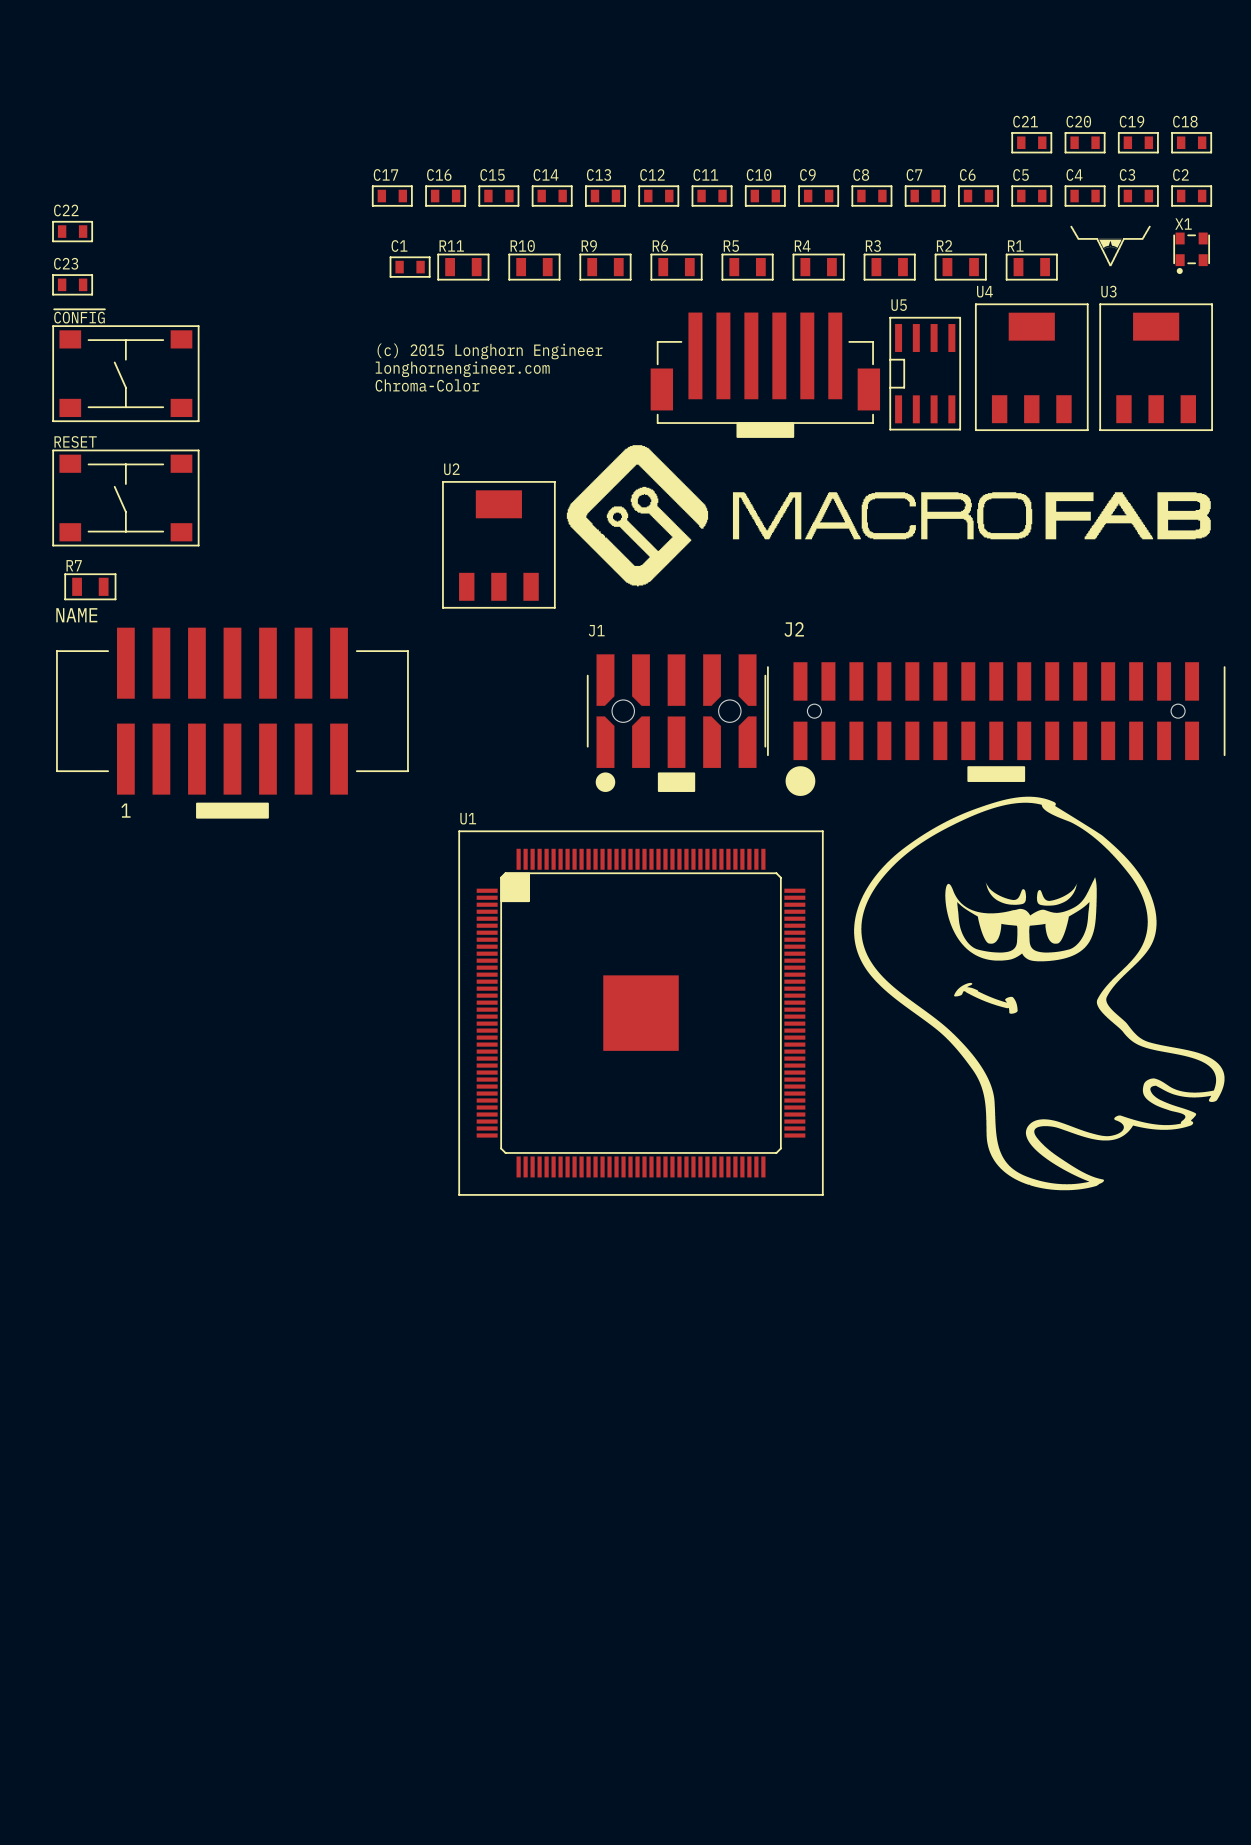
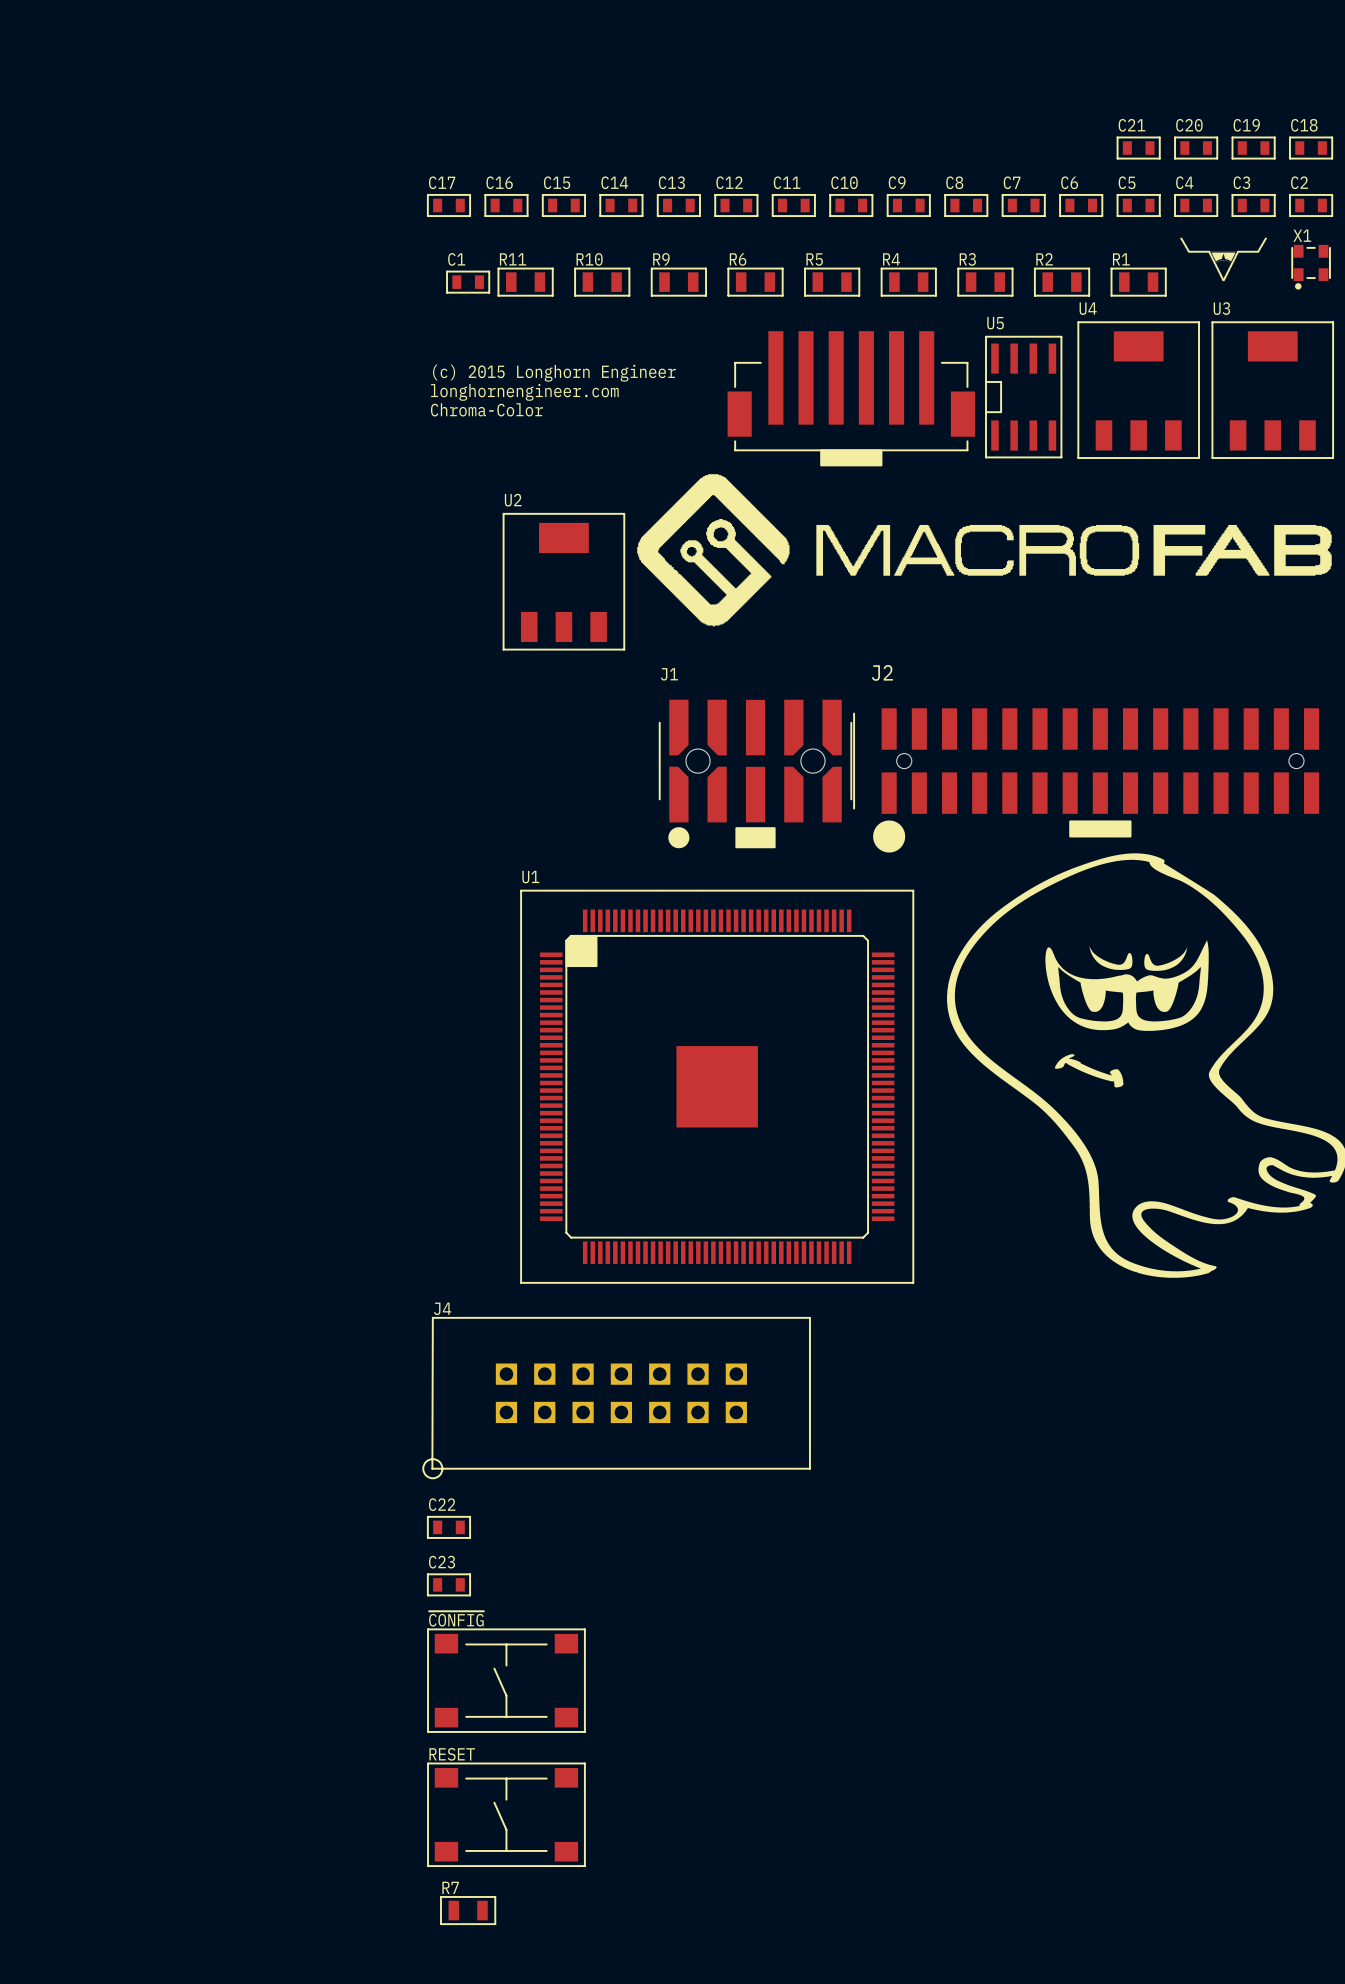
C22 position: (72, 231) -> (448, 1527)
C23 position: (72, 284) -> (448, 1584)
~{CONFIG}: (125, 373) -> none
RESET: (125, 498) -> none
R7 position: (90, 586) -> (468, 1910)
part: (232, 723) -> none
J4: none -> (616, 1398)
~{CONFIG}: none -> (506, 1680)
RESET: none -> (506, 1814)

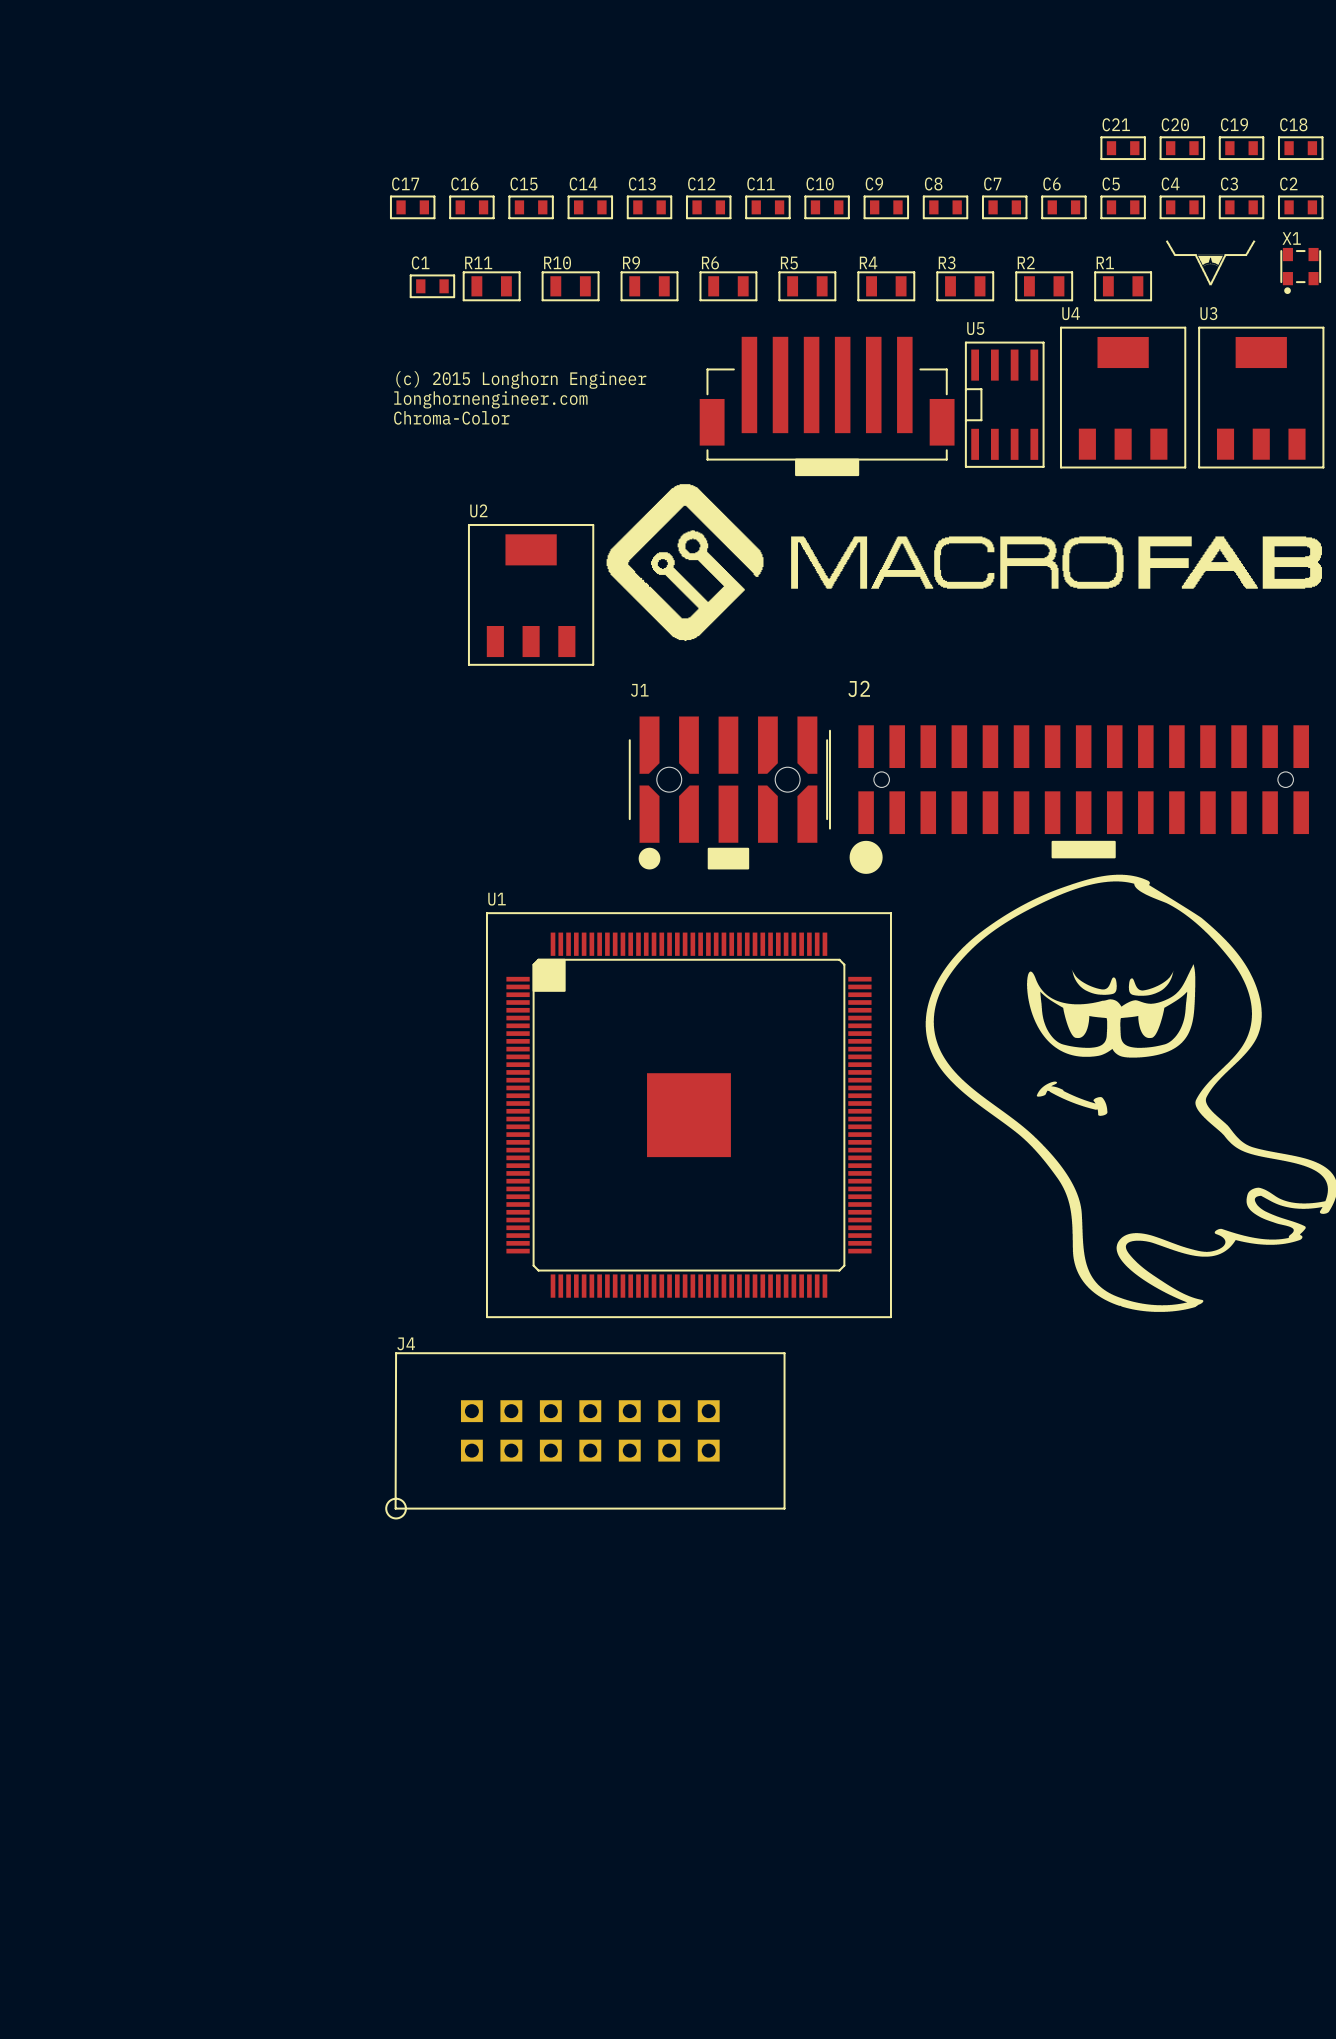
C22: (448, 1527) -> none
C23: (448, 1584) -> none
~{CONFIG}: (506, 1680) -> none
RESET: (506, 1814) -> none
R7: (468, 1910) -> none

